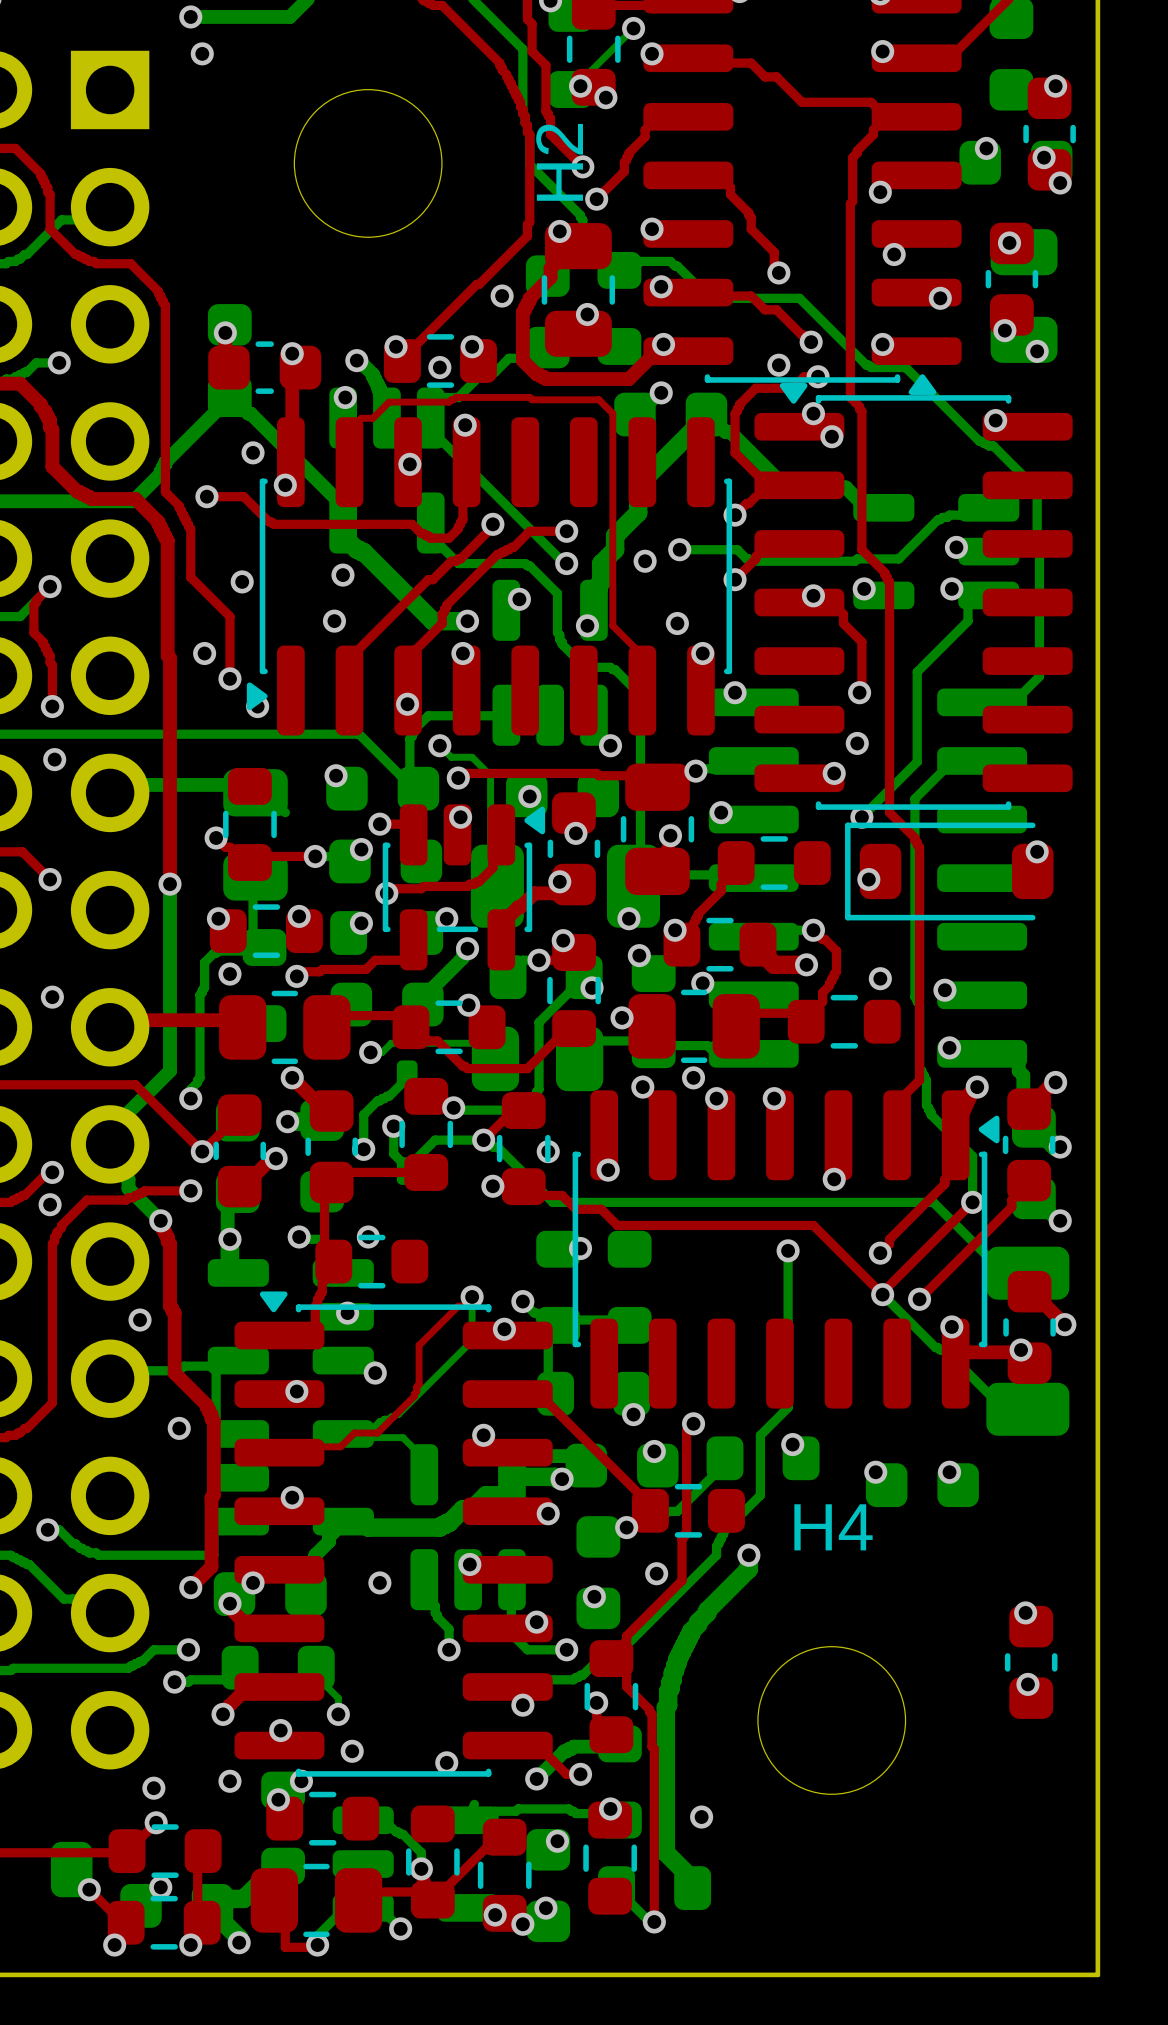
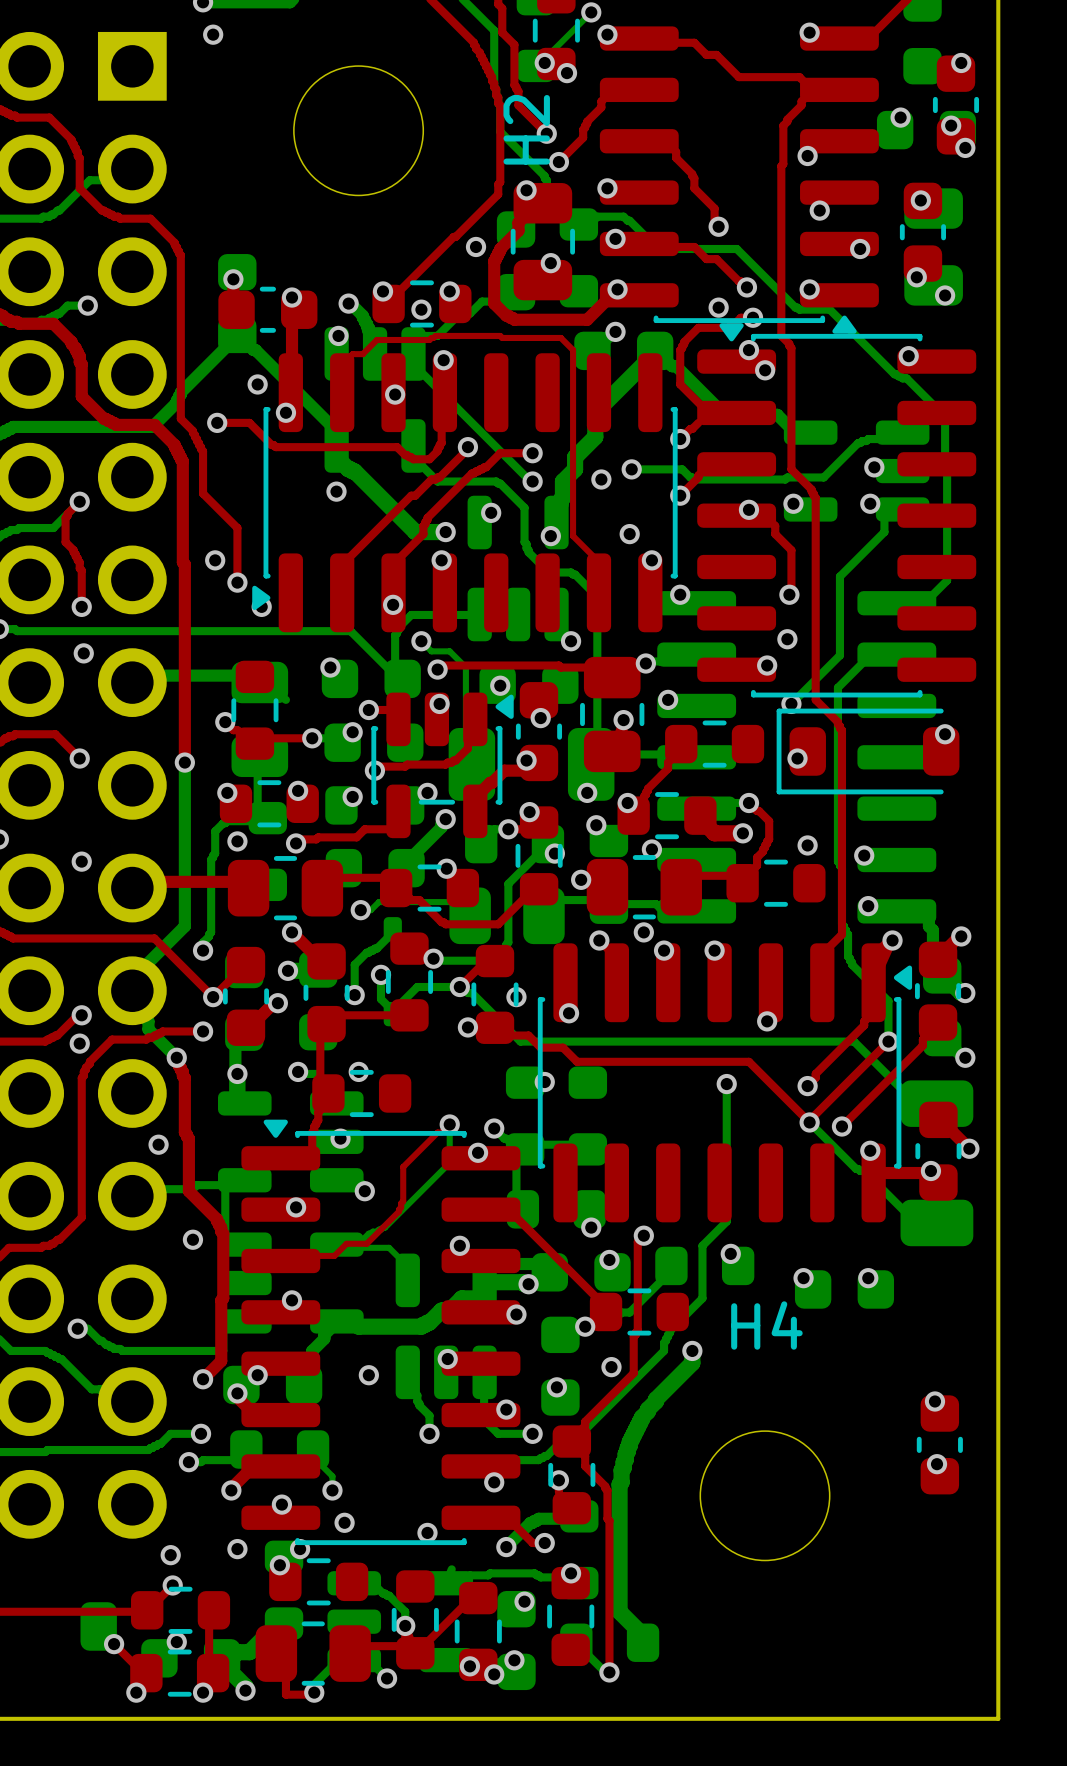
via: (242, 581) -> none
via: (334, 621) -> none
via: (701, 1817) -> none

